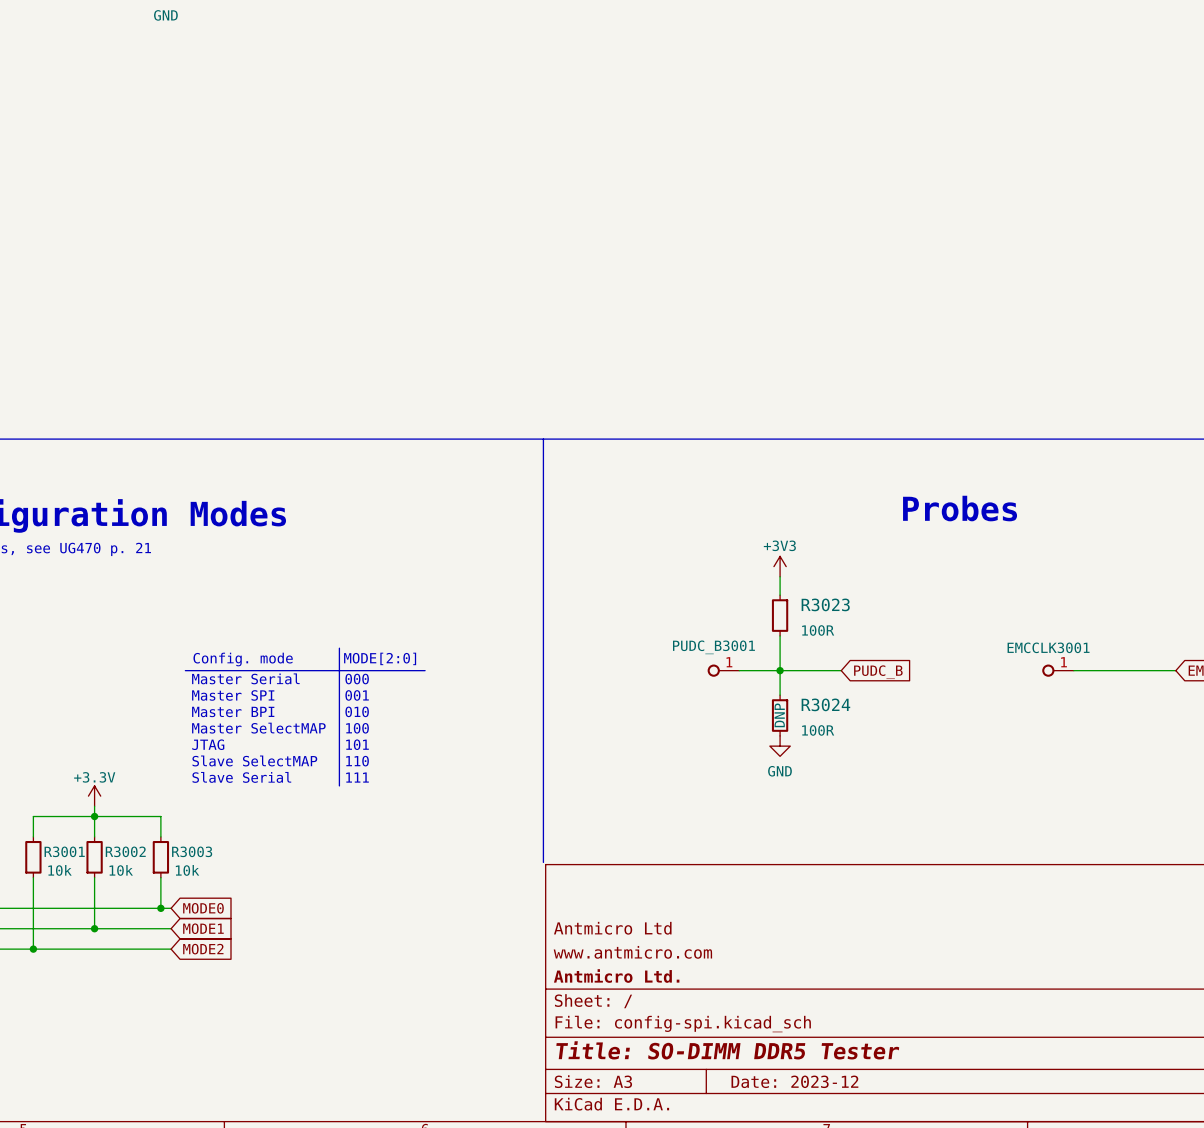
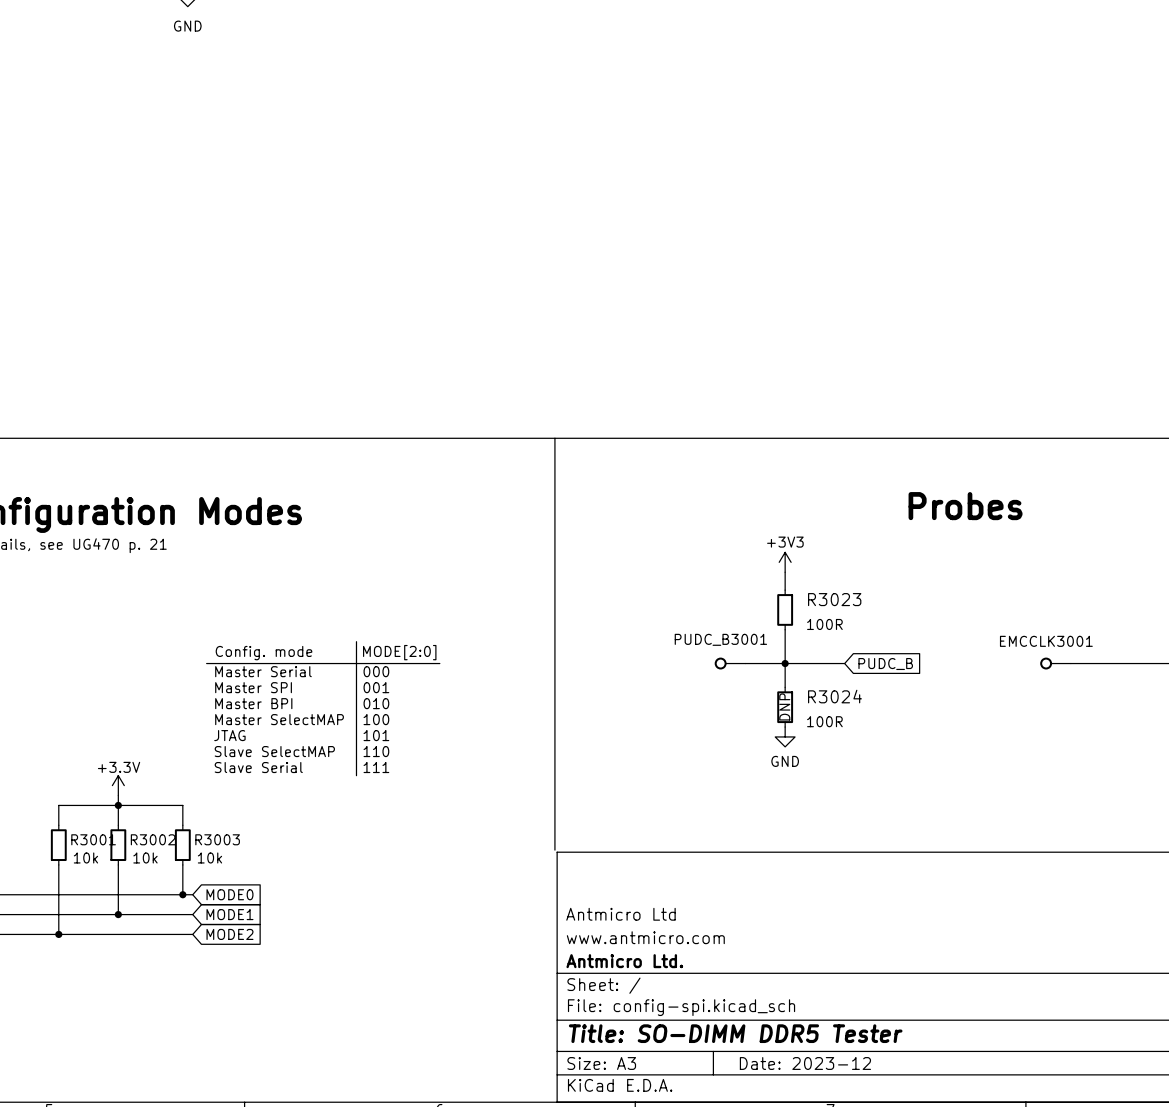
PUDC_B3001 pin number: 1 (729, 662) -> none
EMCCLK3001 pin number: 1 (1064, 662) -> none

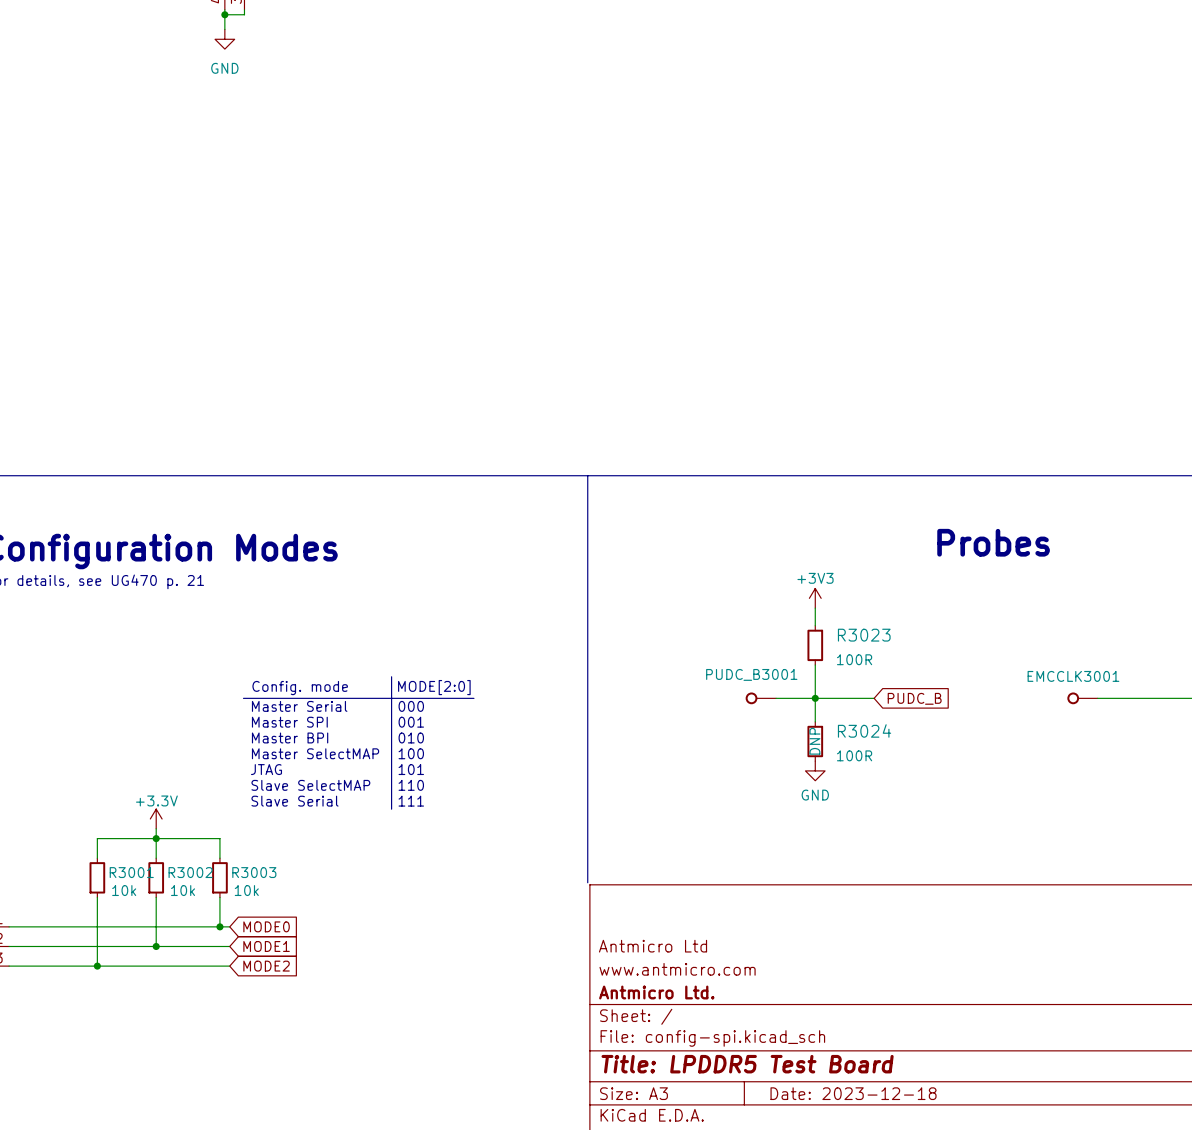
title block: Title: SO-DIMM DDR5 Tester (735, 1033) -> Title: LPDDR5 Test Board (747, 1064)
title block: Date: 2023-12 (805, 1063) -> Date: 2023-12-18 (853, 1093)

